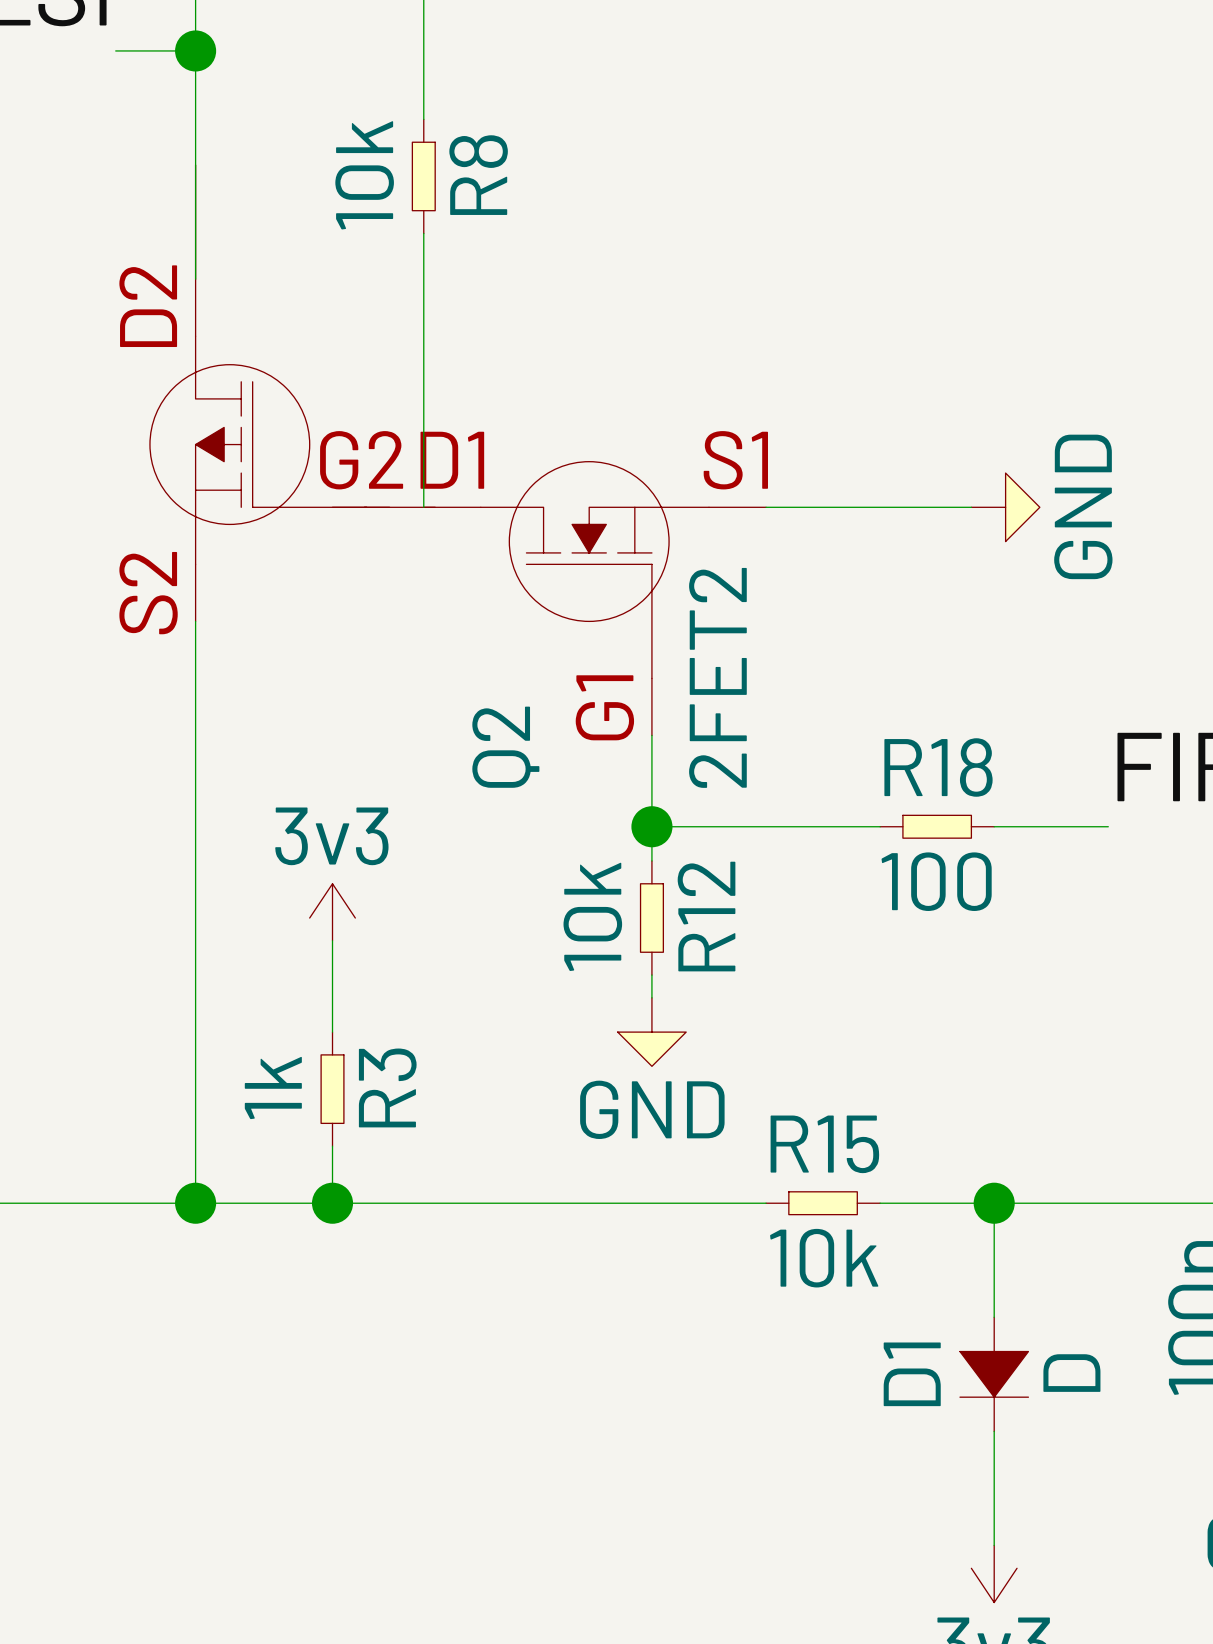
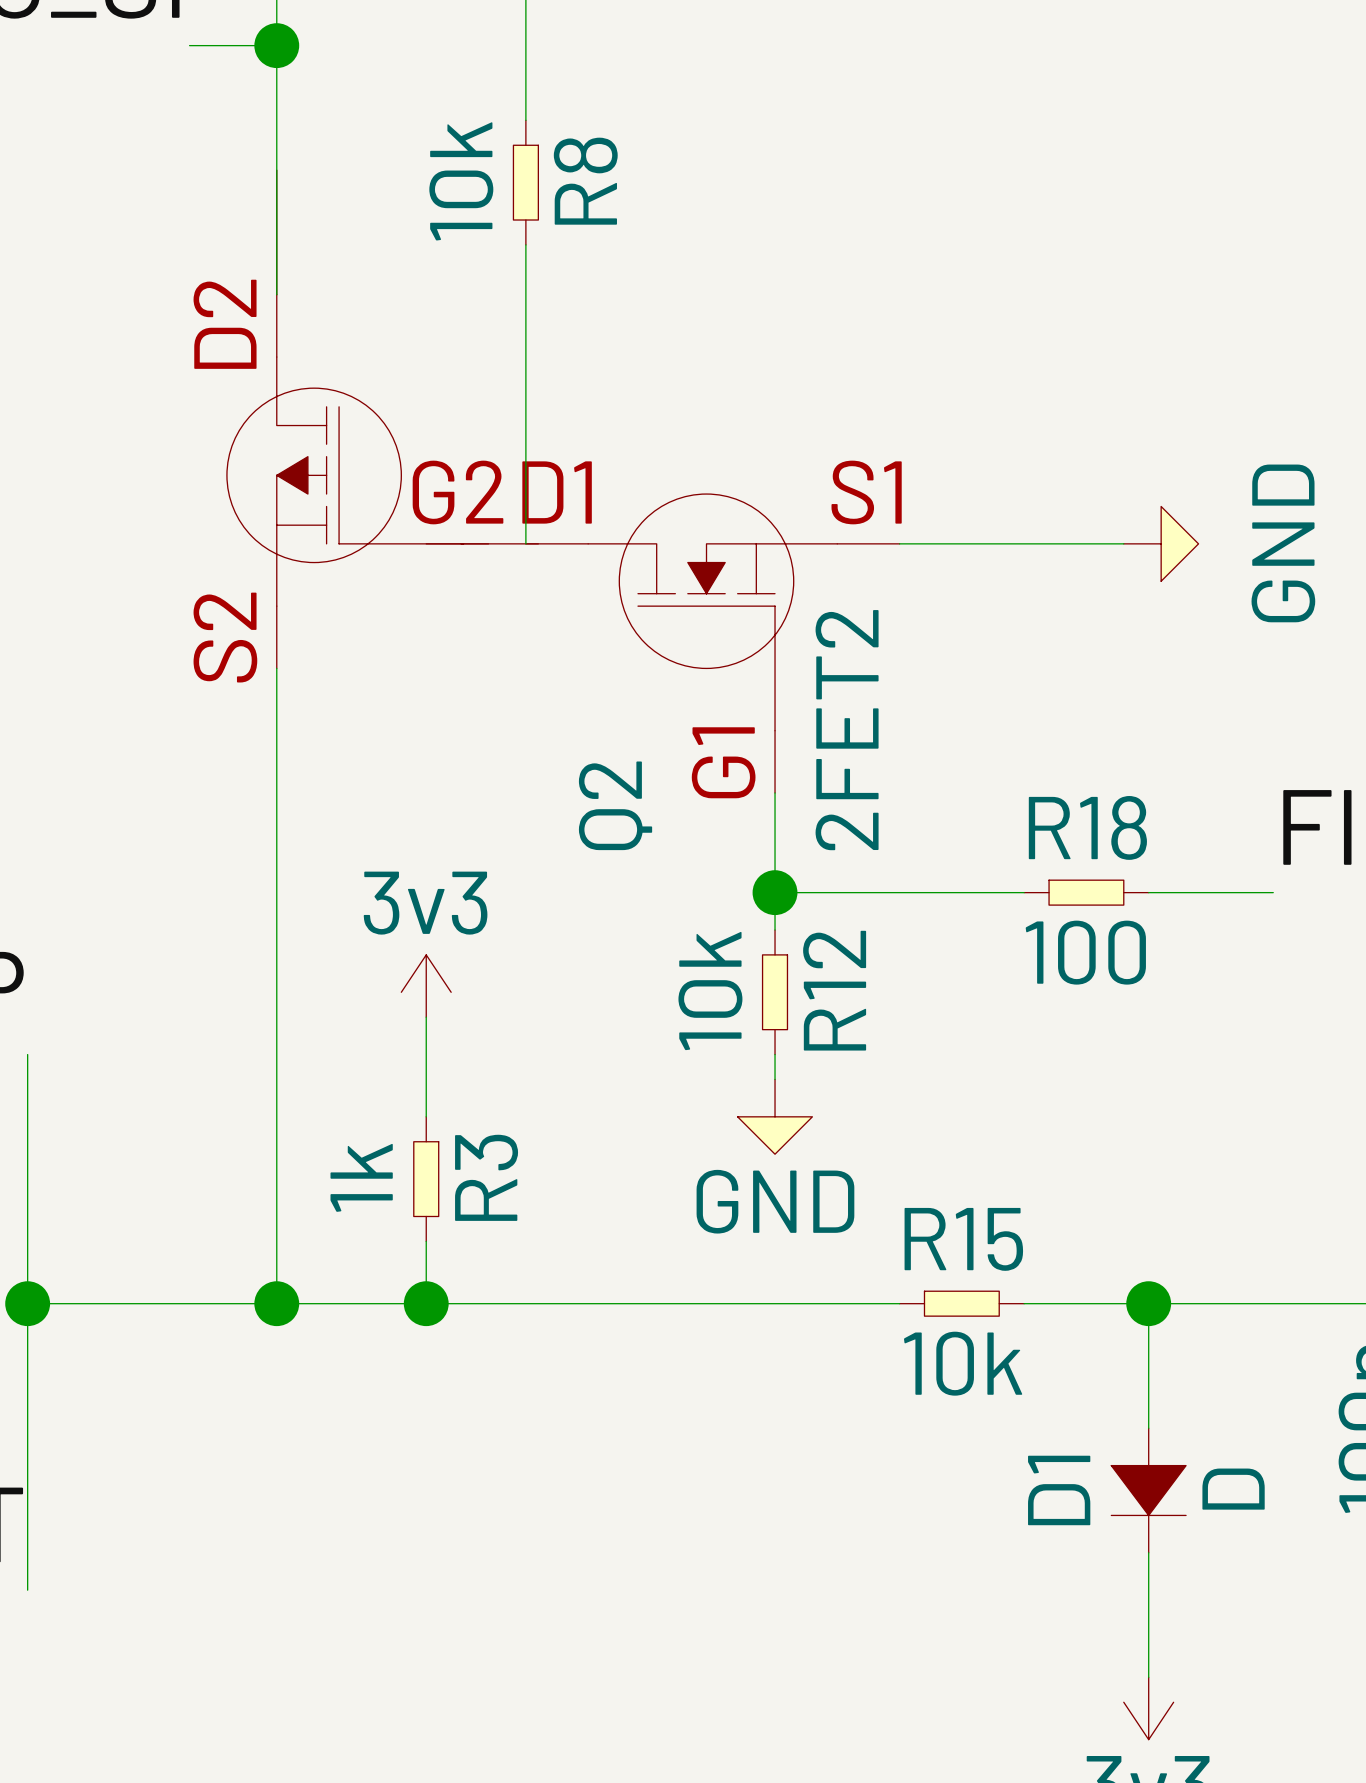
power symbol text position: GND (1083, 506) -> GND (1283, 543)

